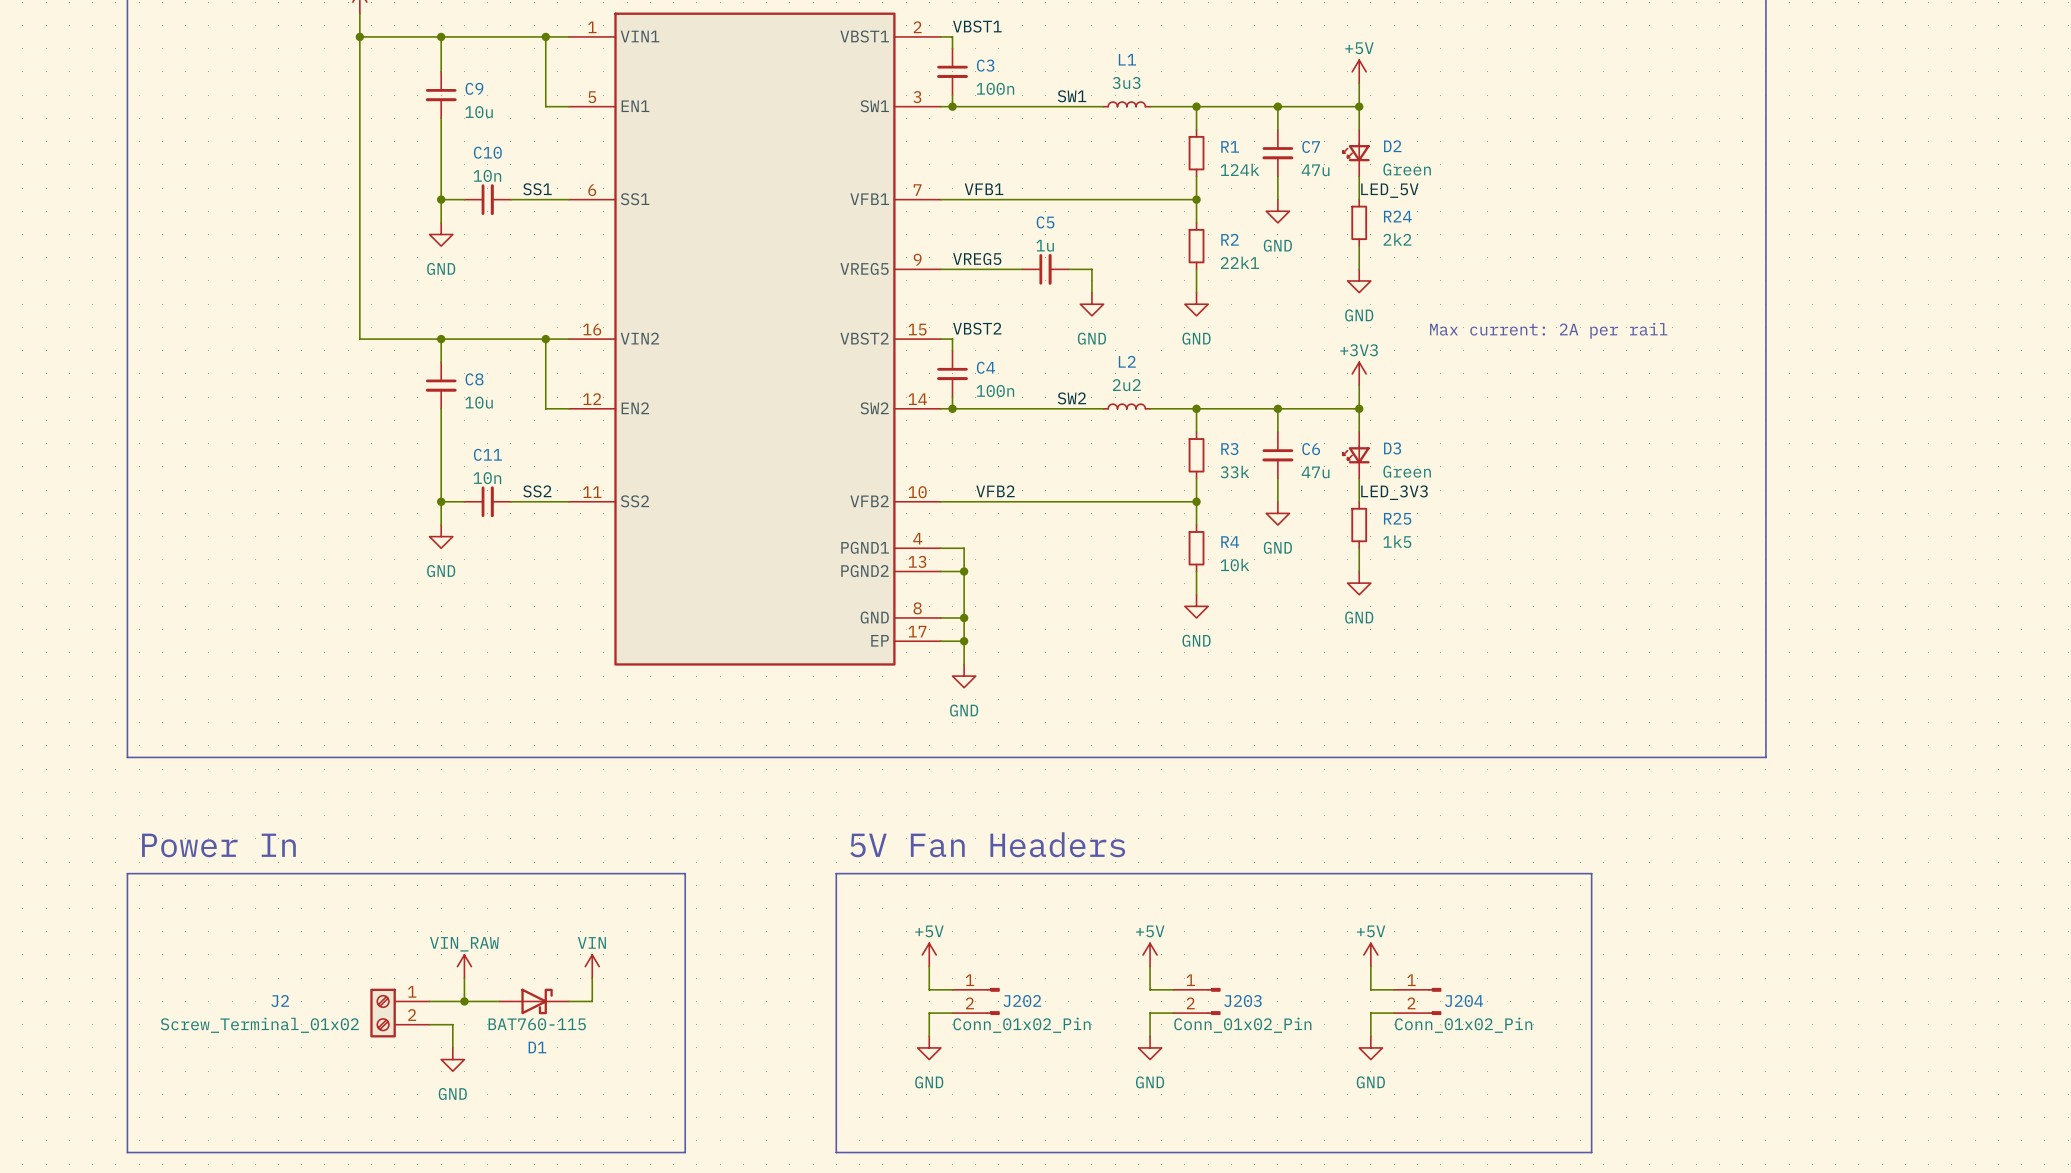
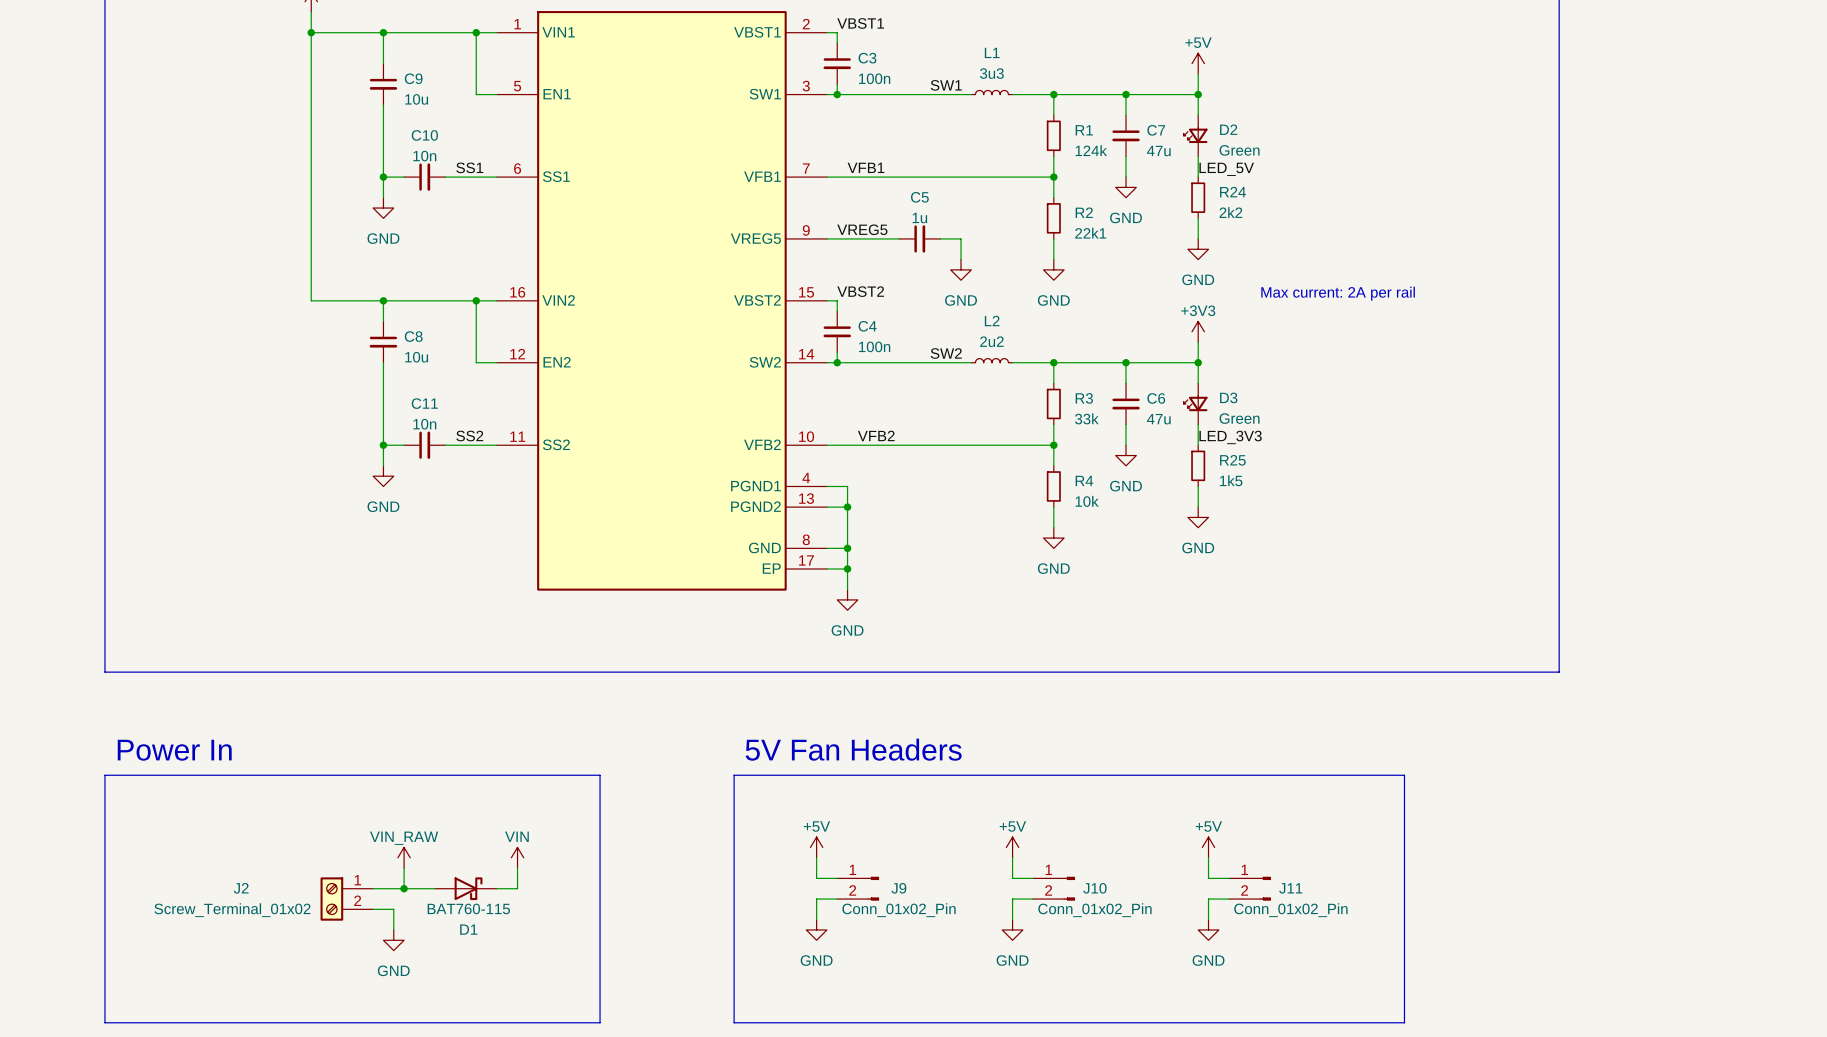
J202 name: J202 (1022, 1001) -> J9 (898, 888)
J203 name: J203 (1242, 1001) -> J10 (1094, 888)
J204 name: J204 (1464, 1001) -> J11 (1290, 888)

